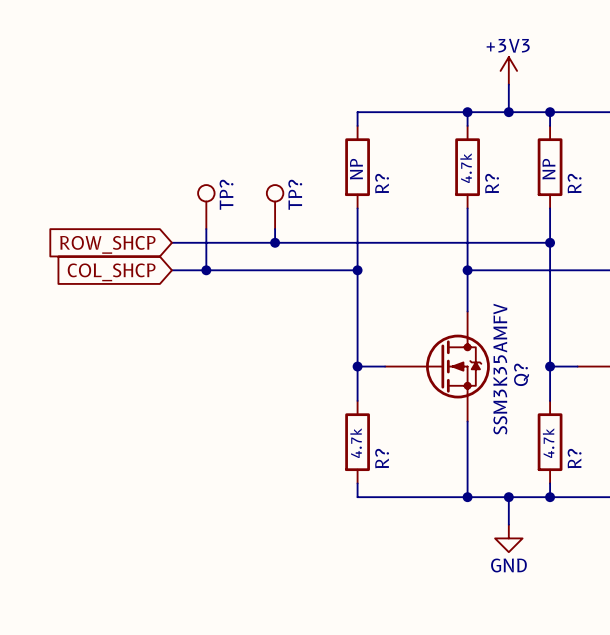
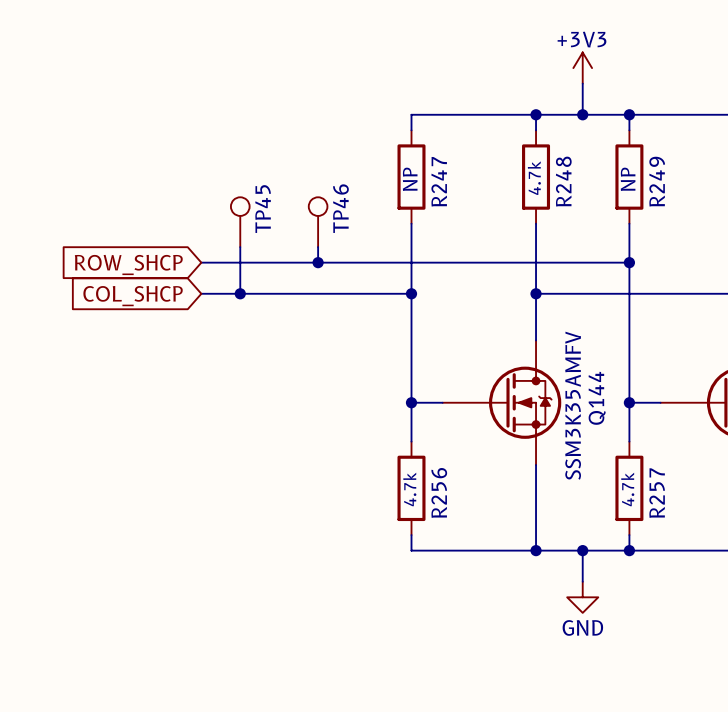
R? name: R? (382, 183) -> R247 (439, 181)
R? name: R? (492, 183) -> R248 (563, 181)
R? name: R? (574, 183) -> R249 (657, 181)
TP? name: TP? (226, 194) -> TP45 (263, 209)
TP? name: TP? (295, 194) -> TP46 (340, 208)
Q? name: Q? (521, 374) -> Q144 (597, 398)
R? name: R? (382, 458) -> R256 (439, 492)
R? name: R? (574, 458) -> R257 (657, 493)

